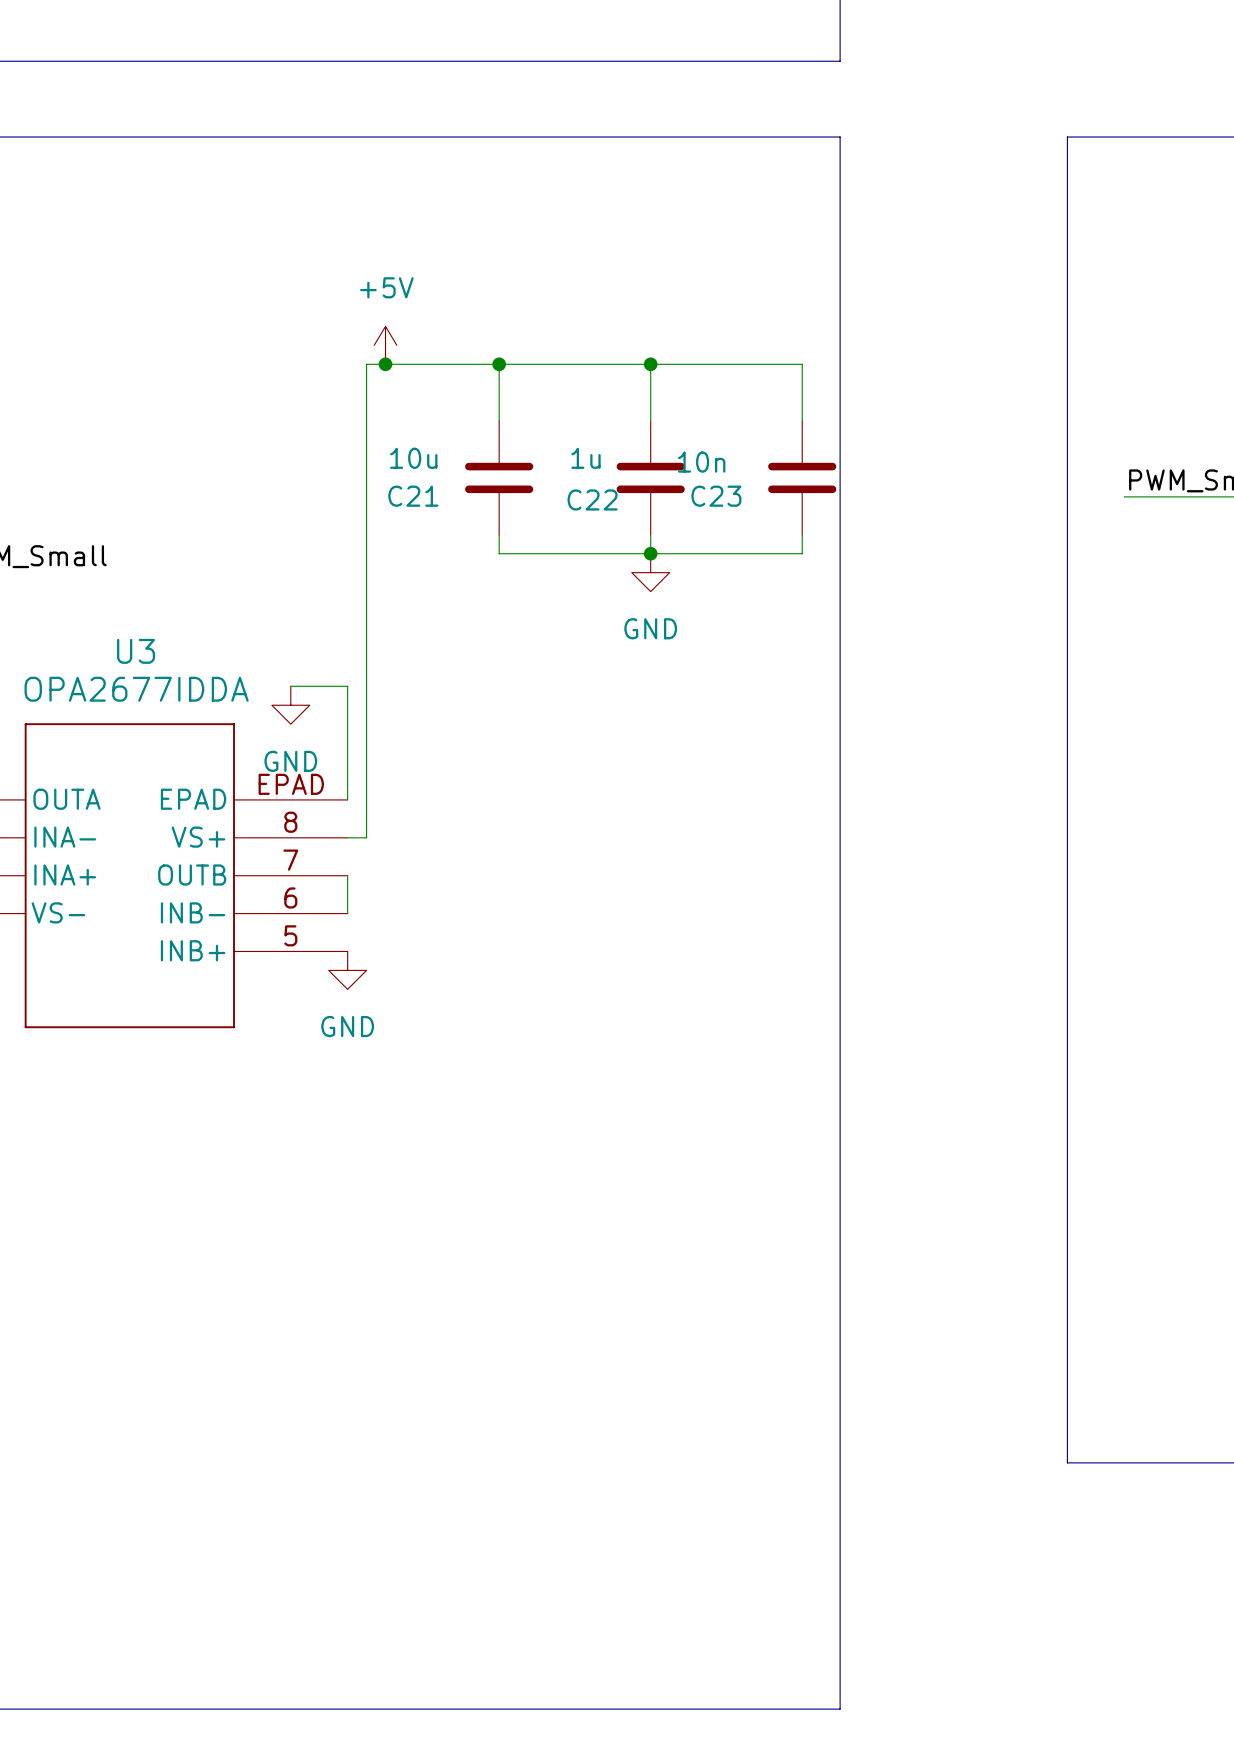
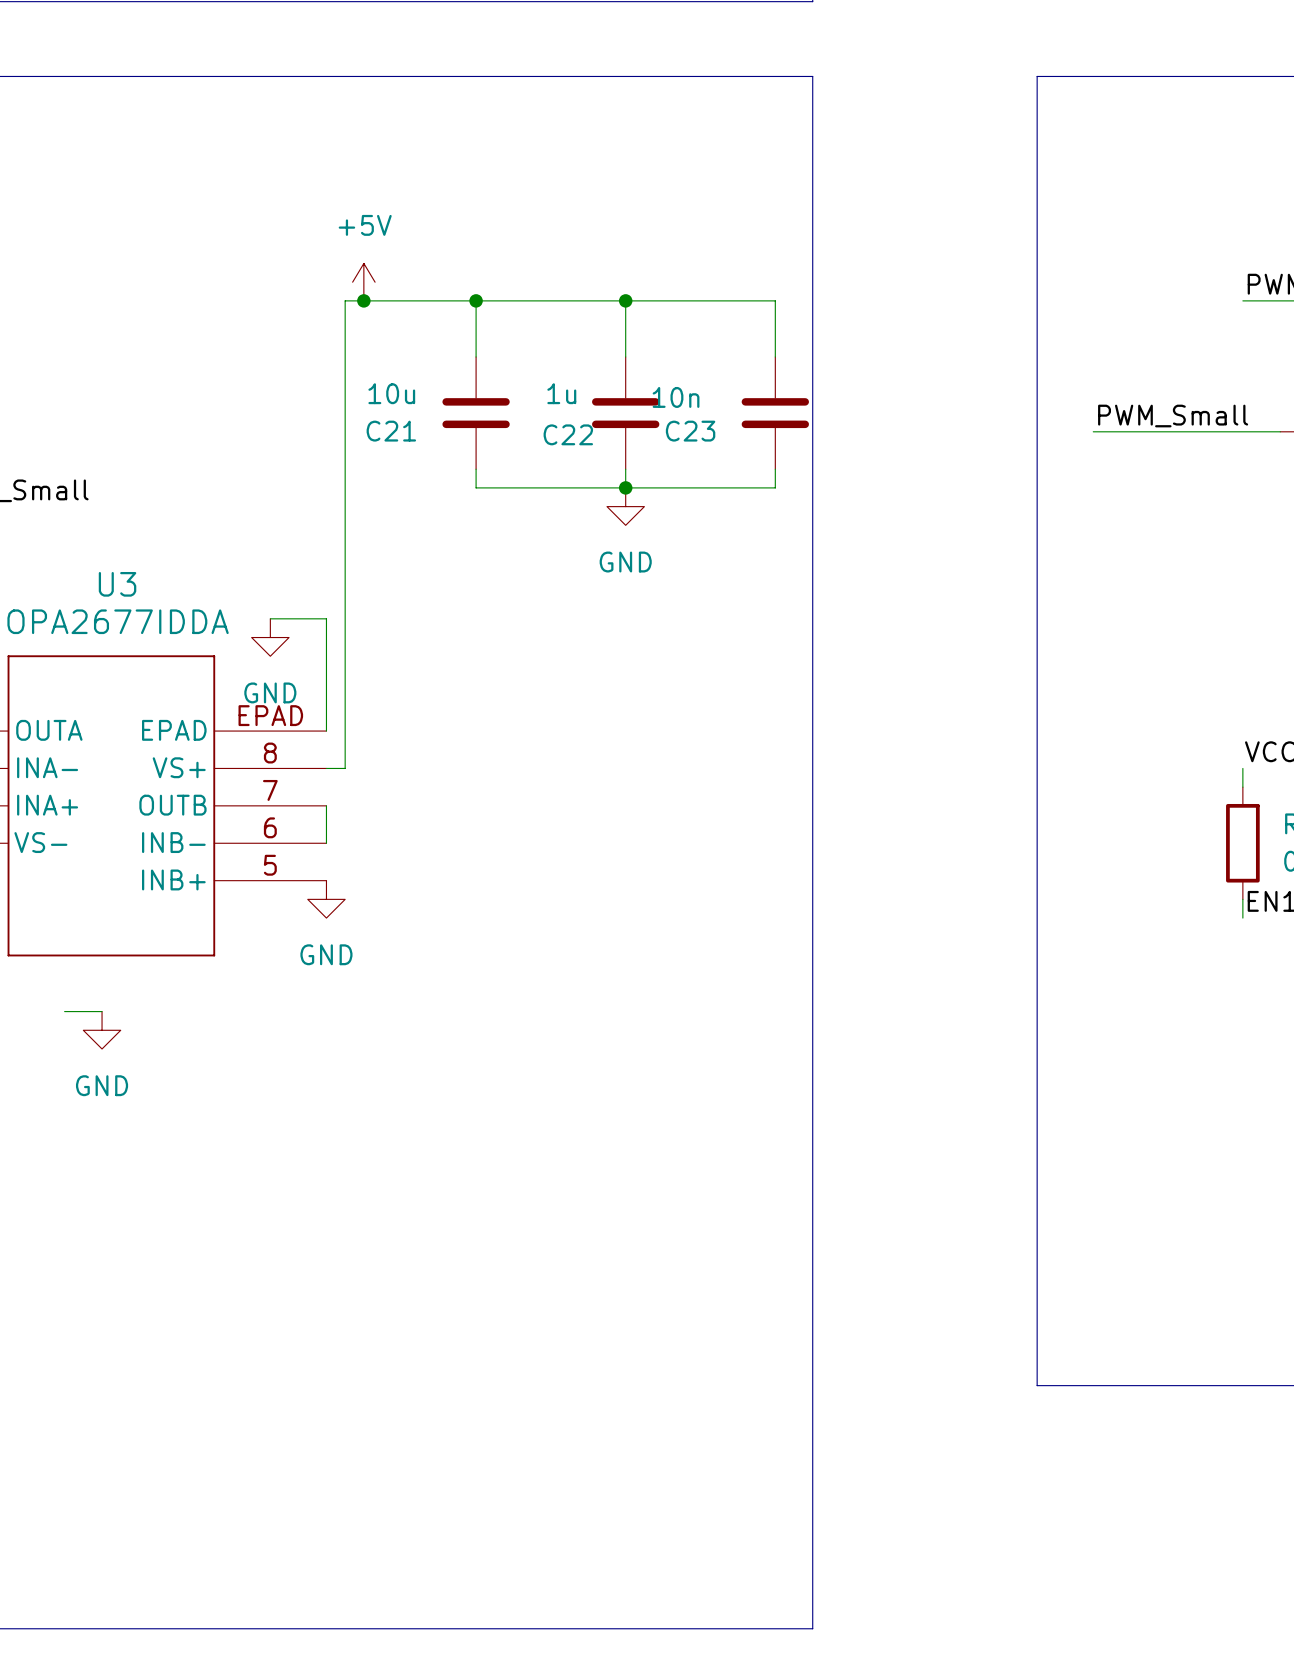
wire: none -> (64, 1011) (102, 1011)
power symbol: none -> GND (102, 1030)

